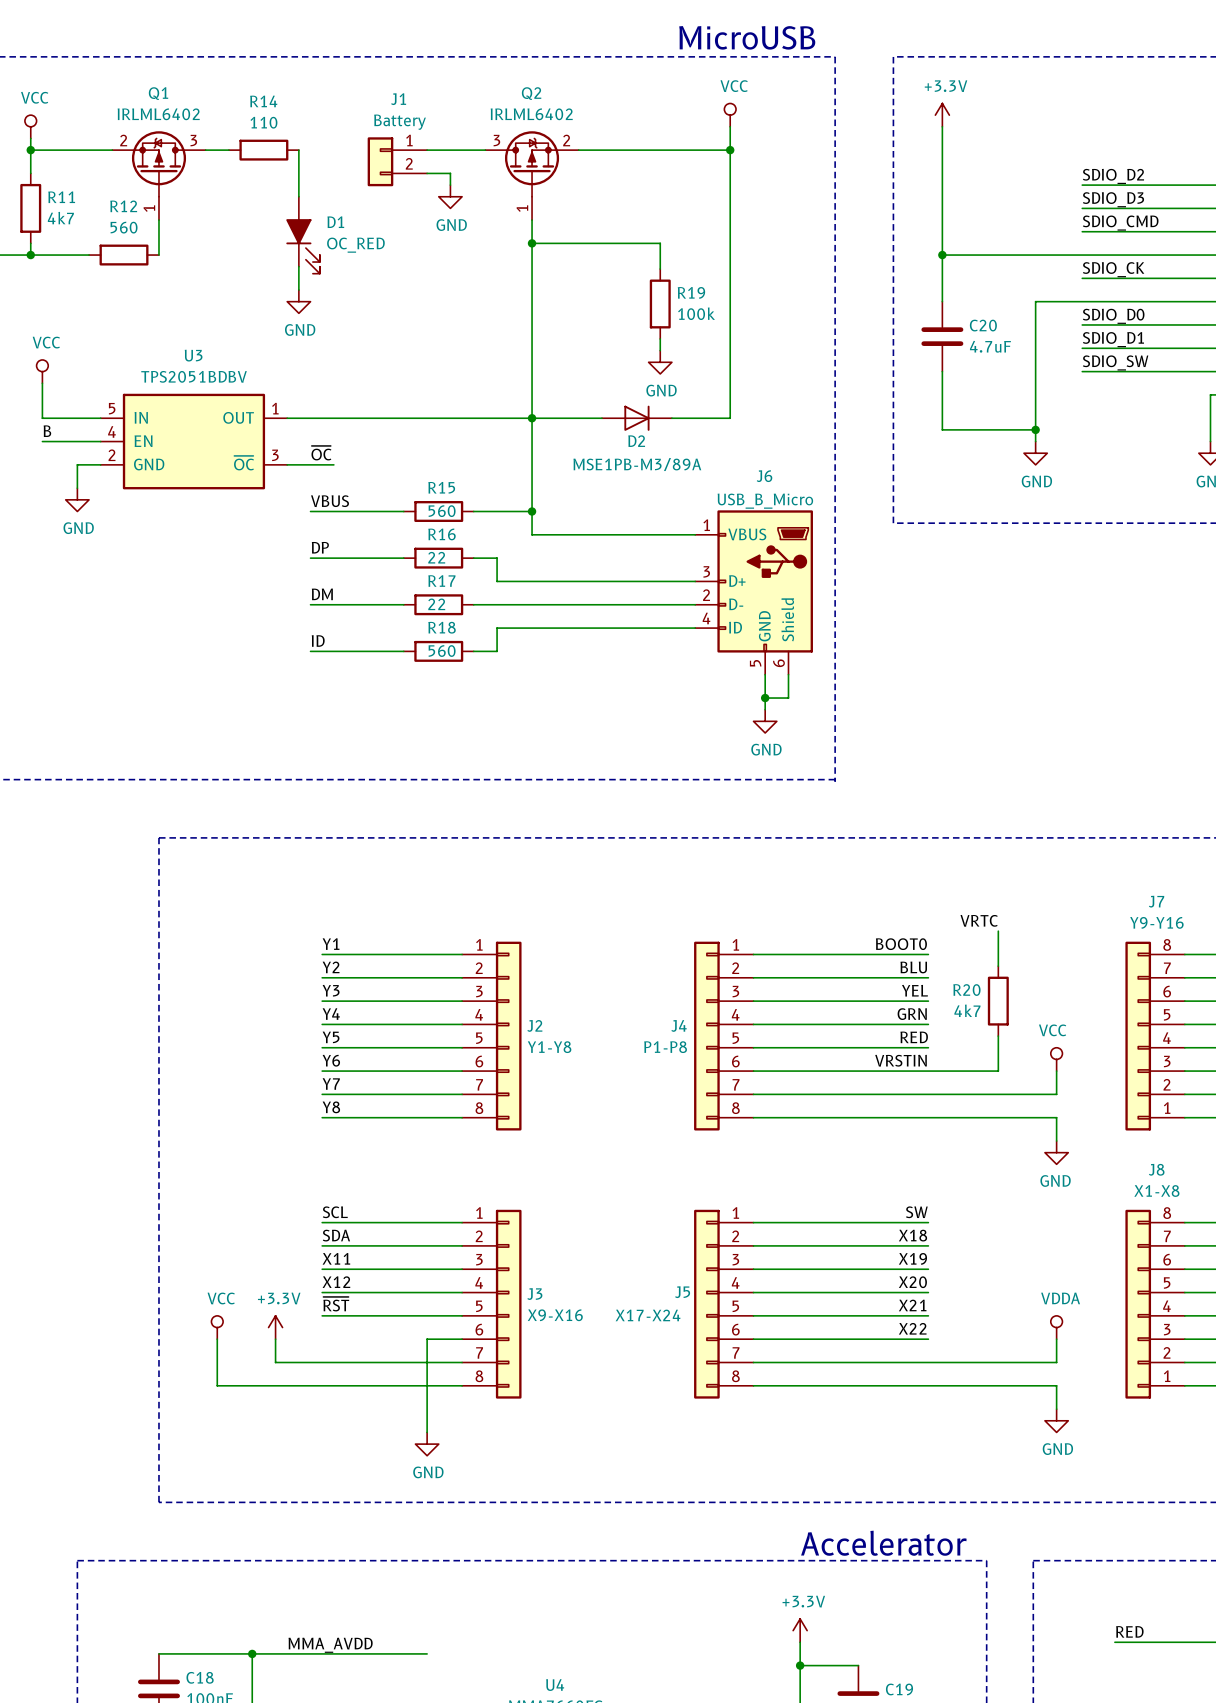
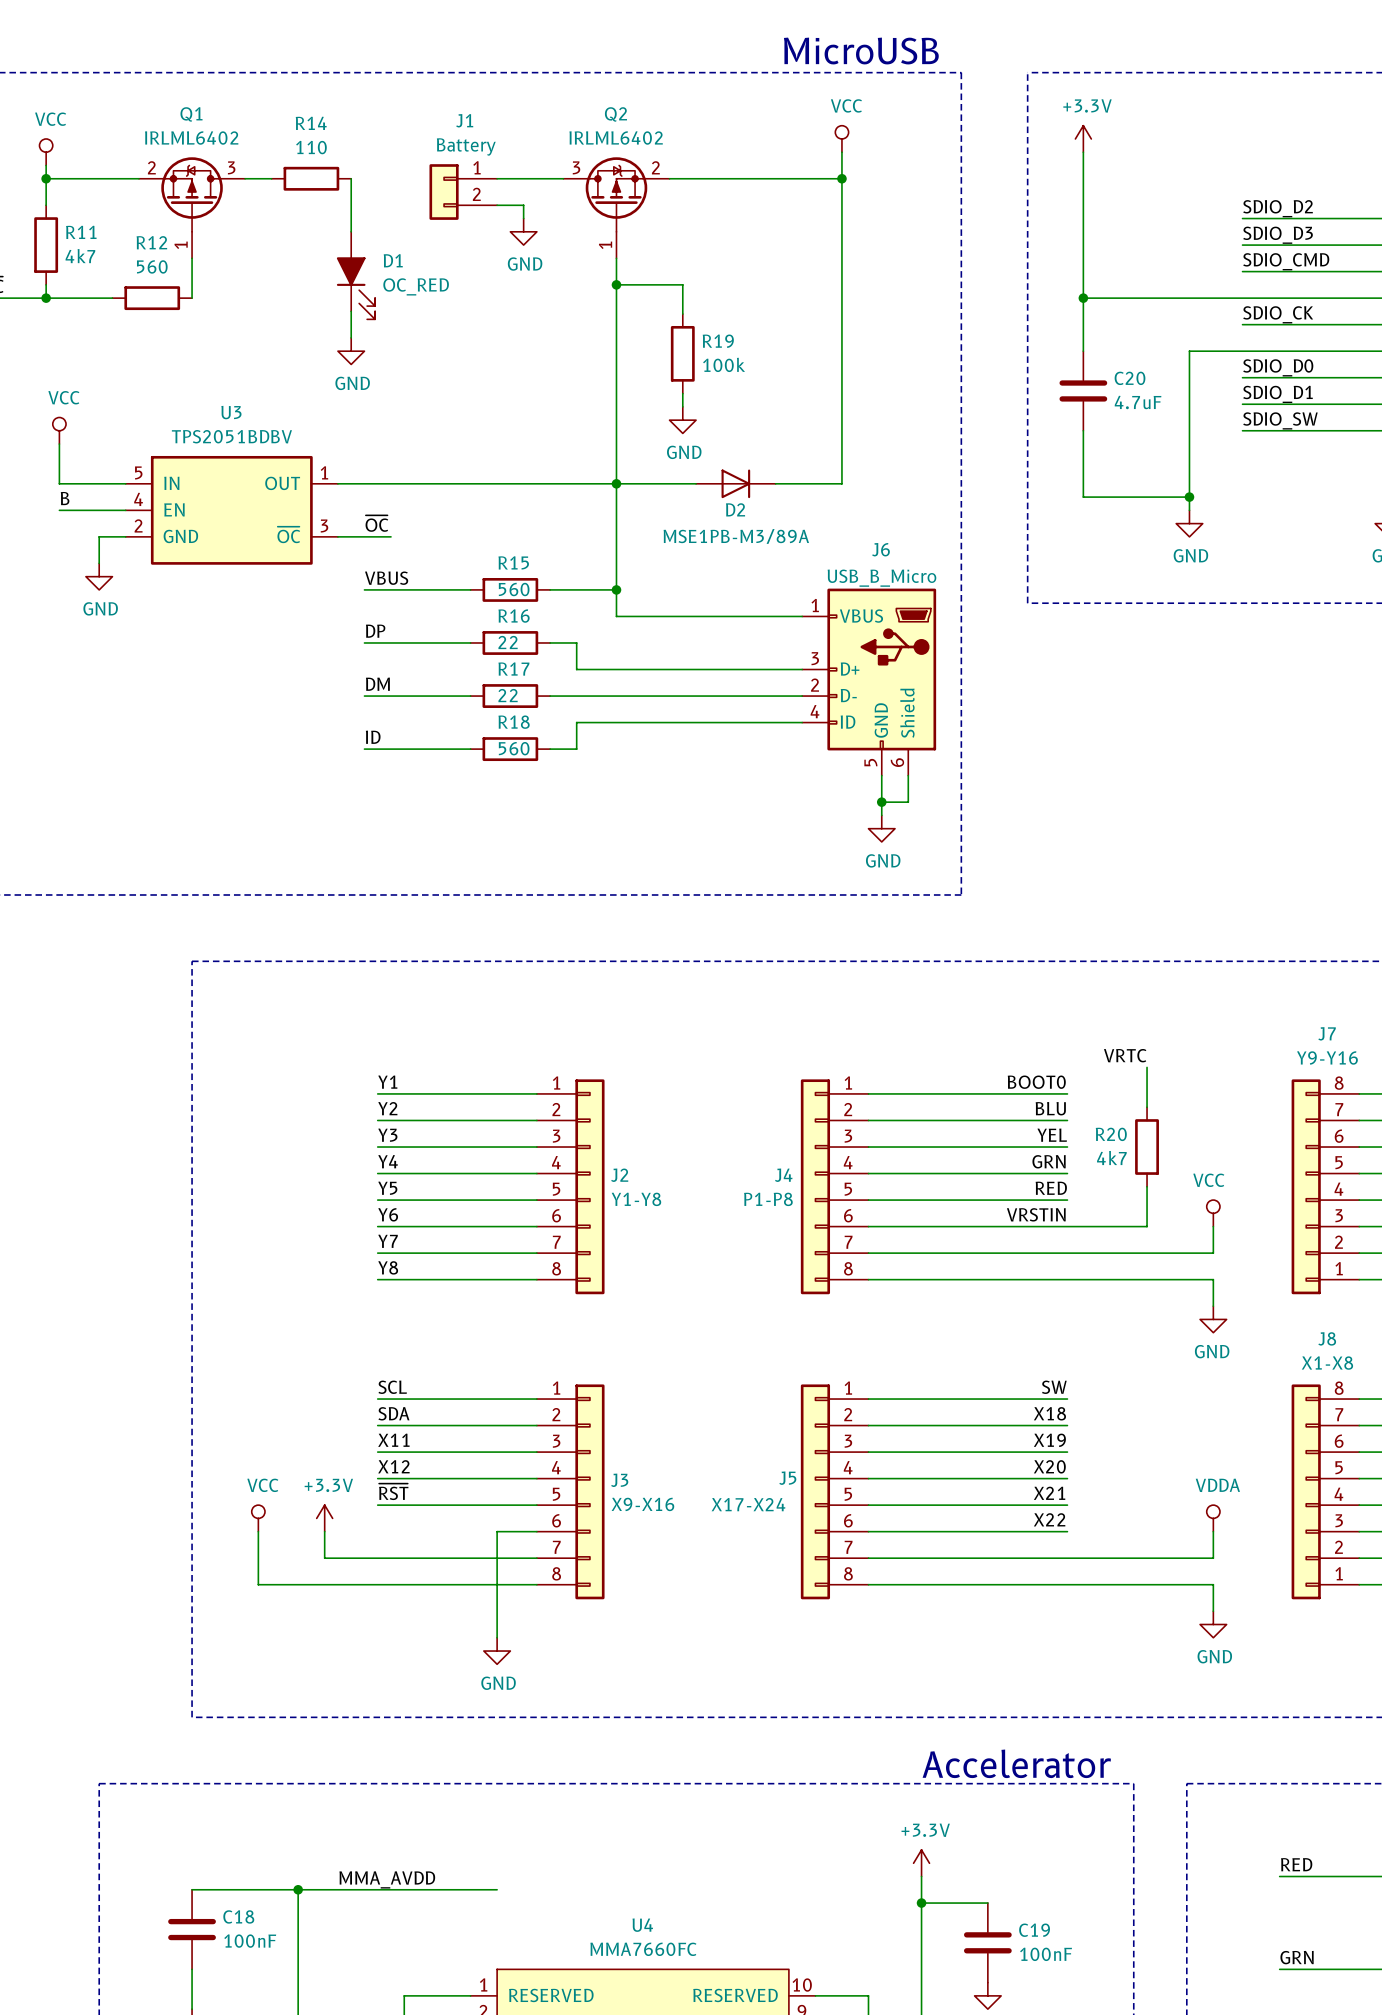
wire: (590, 243) (660, 243) (660, 269) -> (682, 284) (682, 314)
R19 position: (660, 304) -> (682, 353)
wire: (660, 338) (660, 350) -> (682, 393) (682, 406)
power symbol position: GND (660, 362) -> GND (682, 420)

